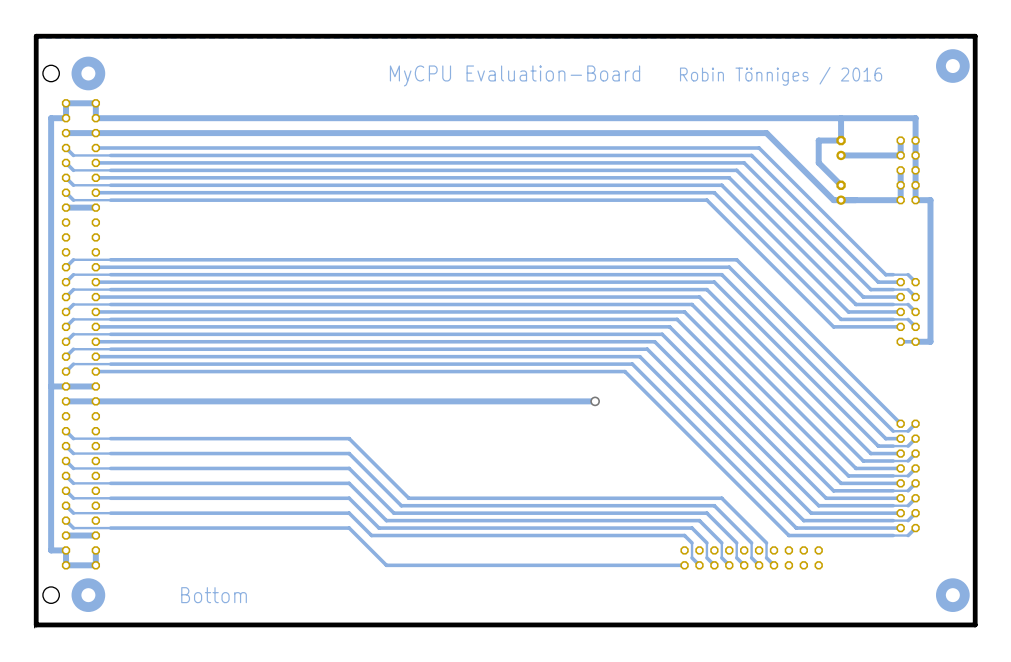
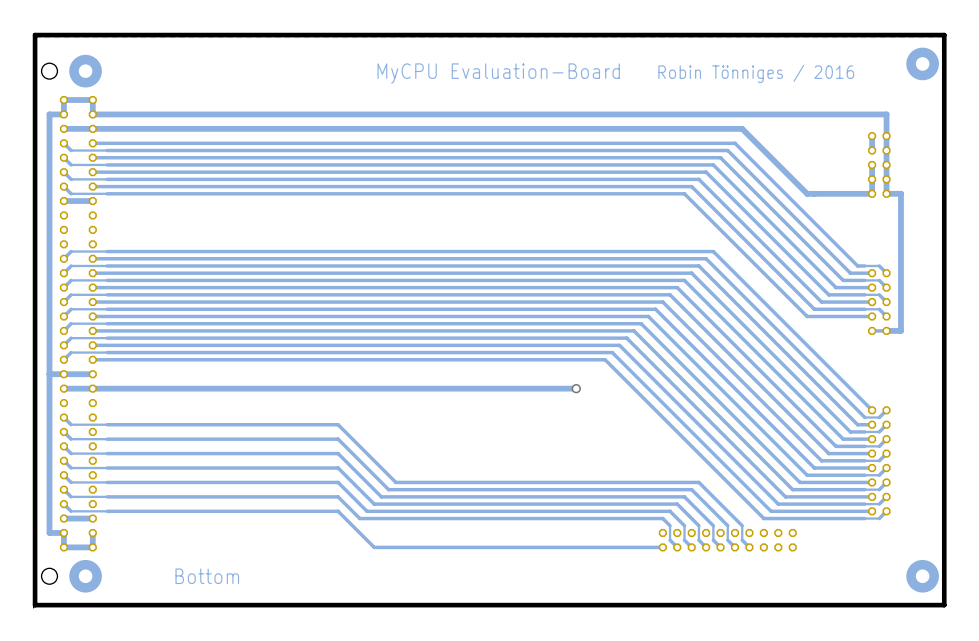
track: (841, 118) (841, 140) (818, 140) (818, 162) (841, 185) -> none
part: (841, 148) -> none
track: (900, 155) (841, 155) -> none
part: (841, 192) -> none

